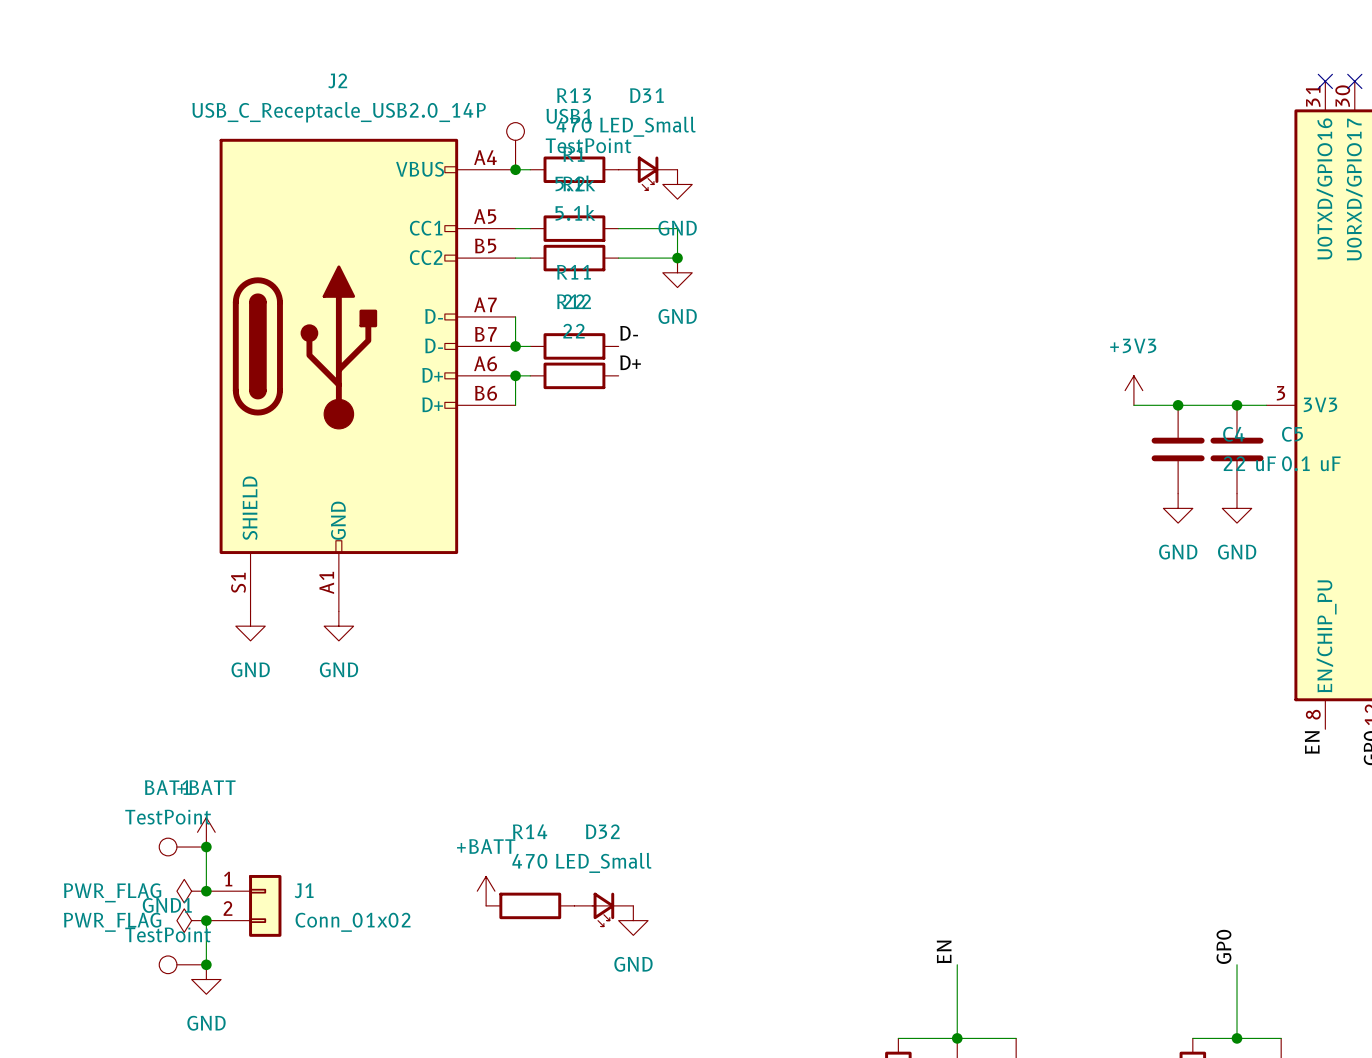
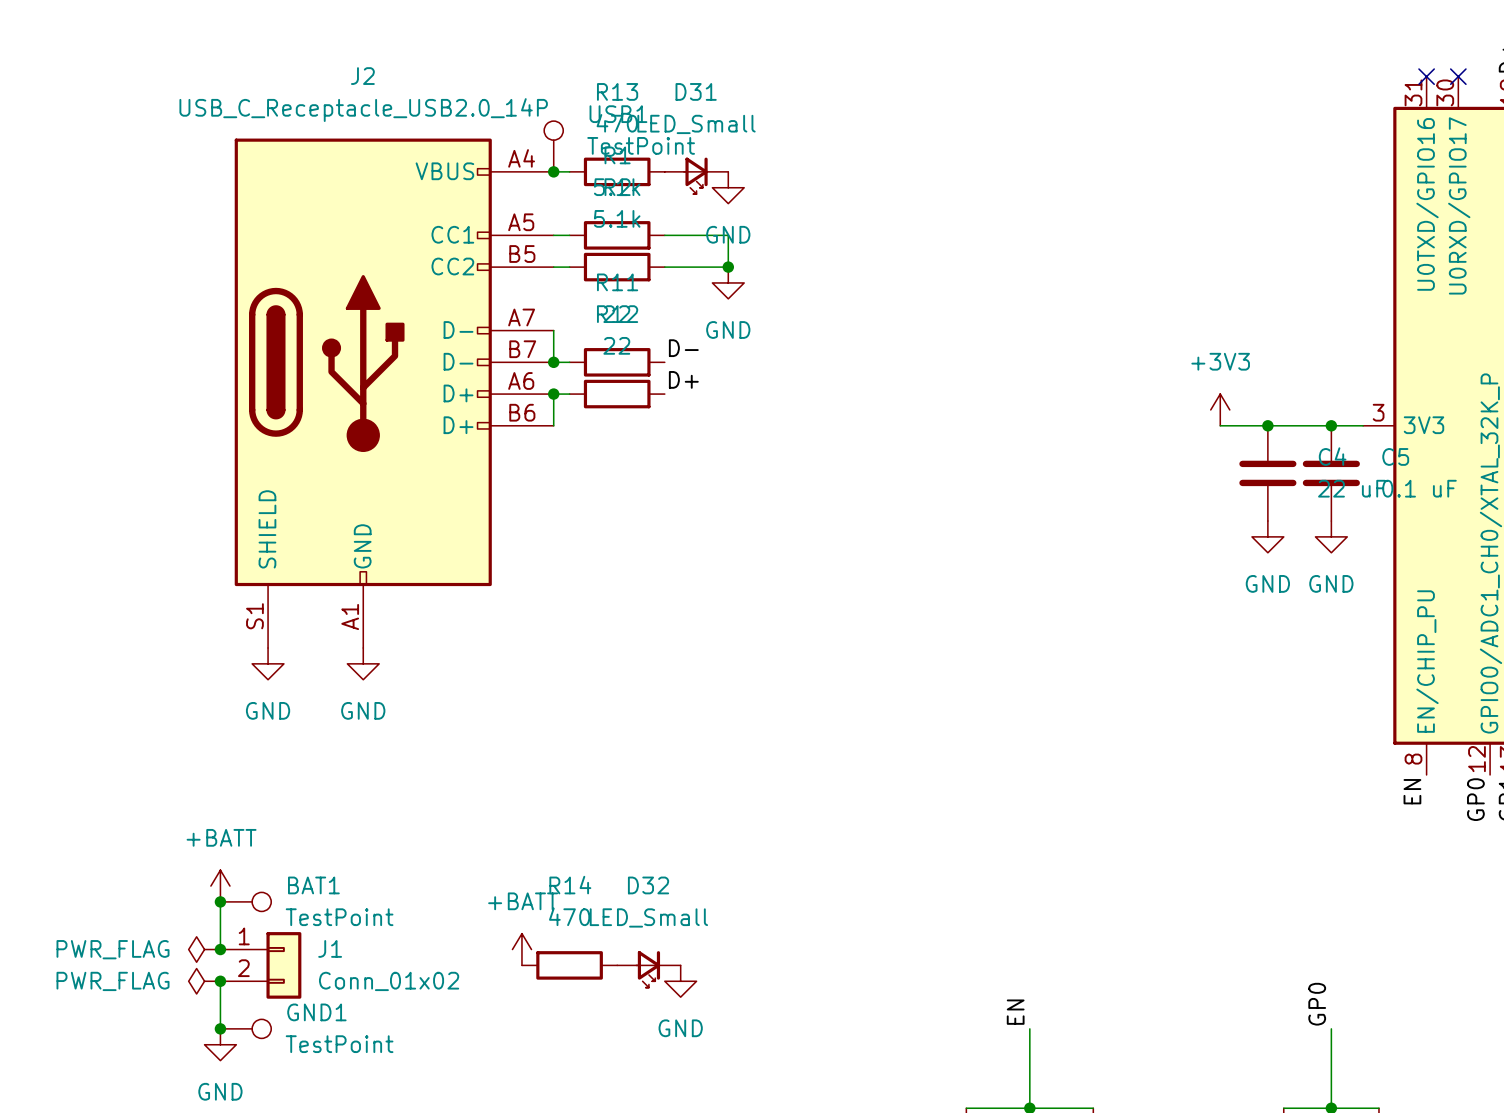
BAT1 name position: BAT1 (167, 787) -> BAT1 (313, 885)
BAT1 value position: TestPoint (168, 817) -> TestPoint (339, 917)
BAT1 rotation: 0° (168, 847) -> 180° (261, 901)
BAT1 position: (182, 847) -> (245, 901)
GND1 name position: GND1 (167, 905) -> GND1 (316, 1012)
GND1 value position: TestPoint (168, 934) -> TestPoint (339, 1044)
GND1 rotation: 0° (168, 964) -> 180° (261, 1028)
GND1 position: (182, 964) -> (245, 1028)

